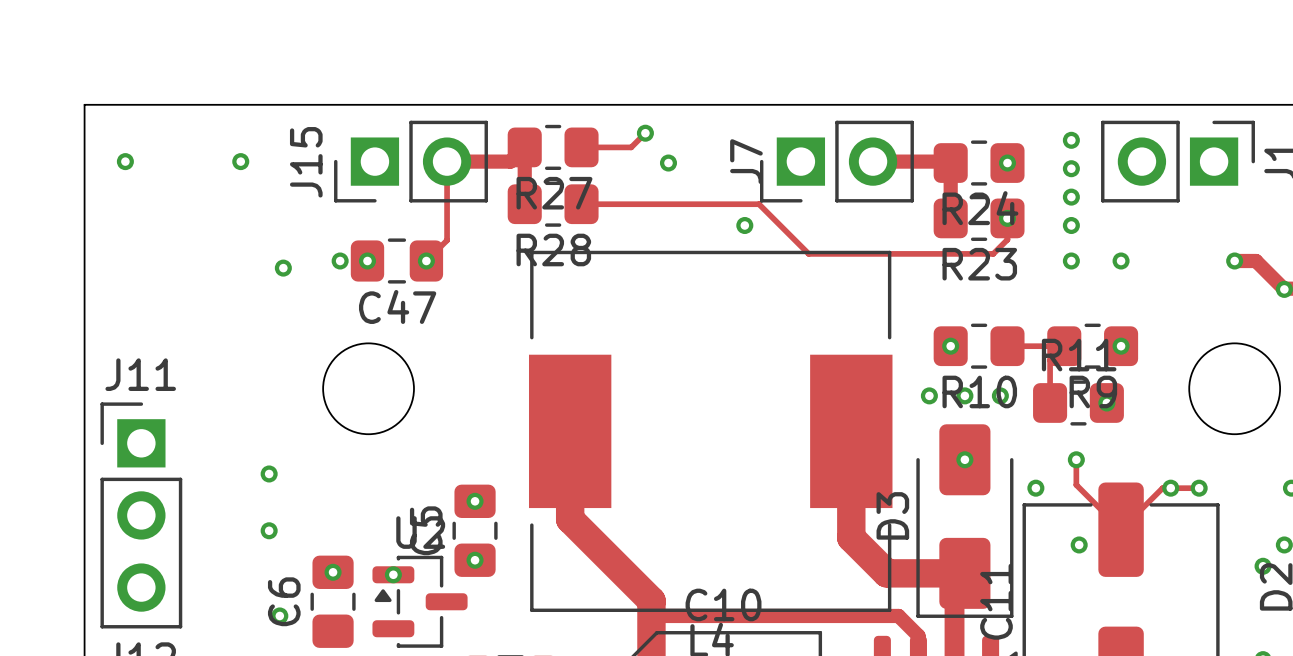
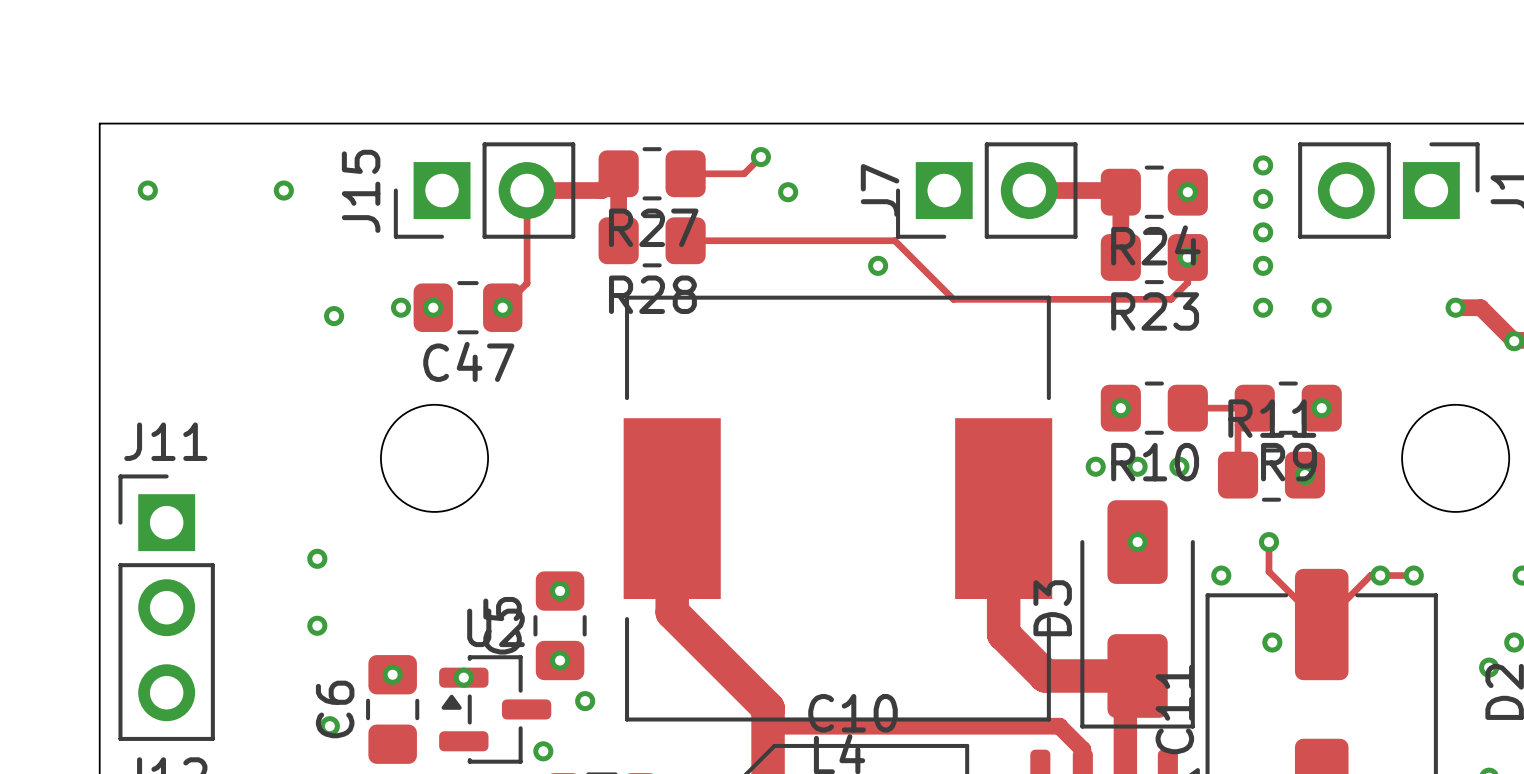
via: none -> (585, 701)
via: none -> (543, 751)

